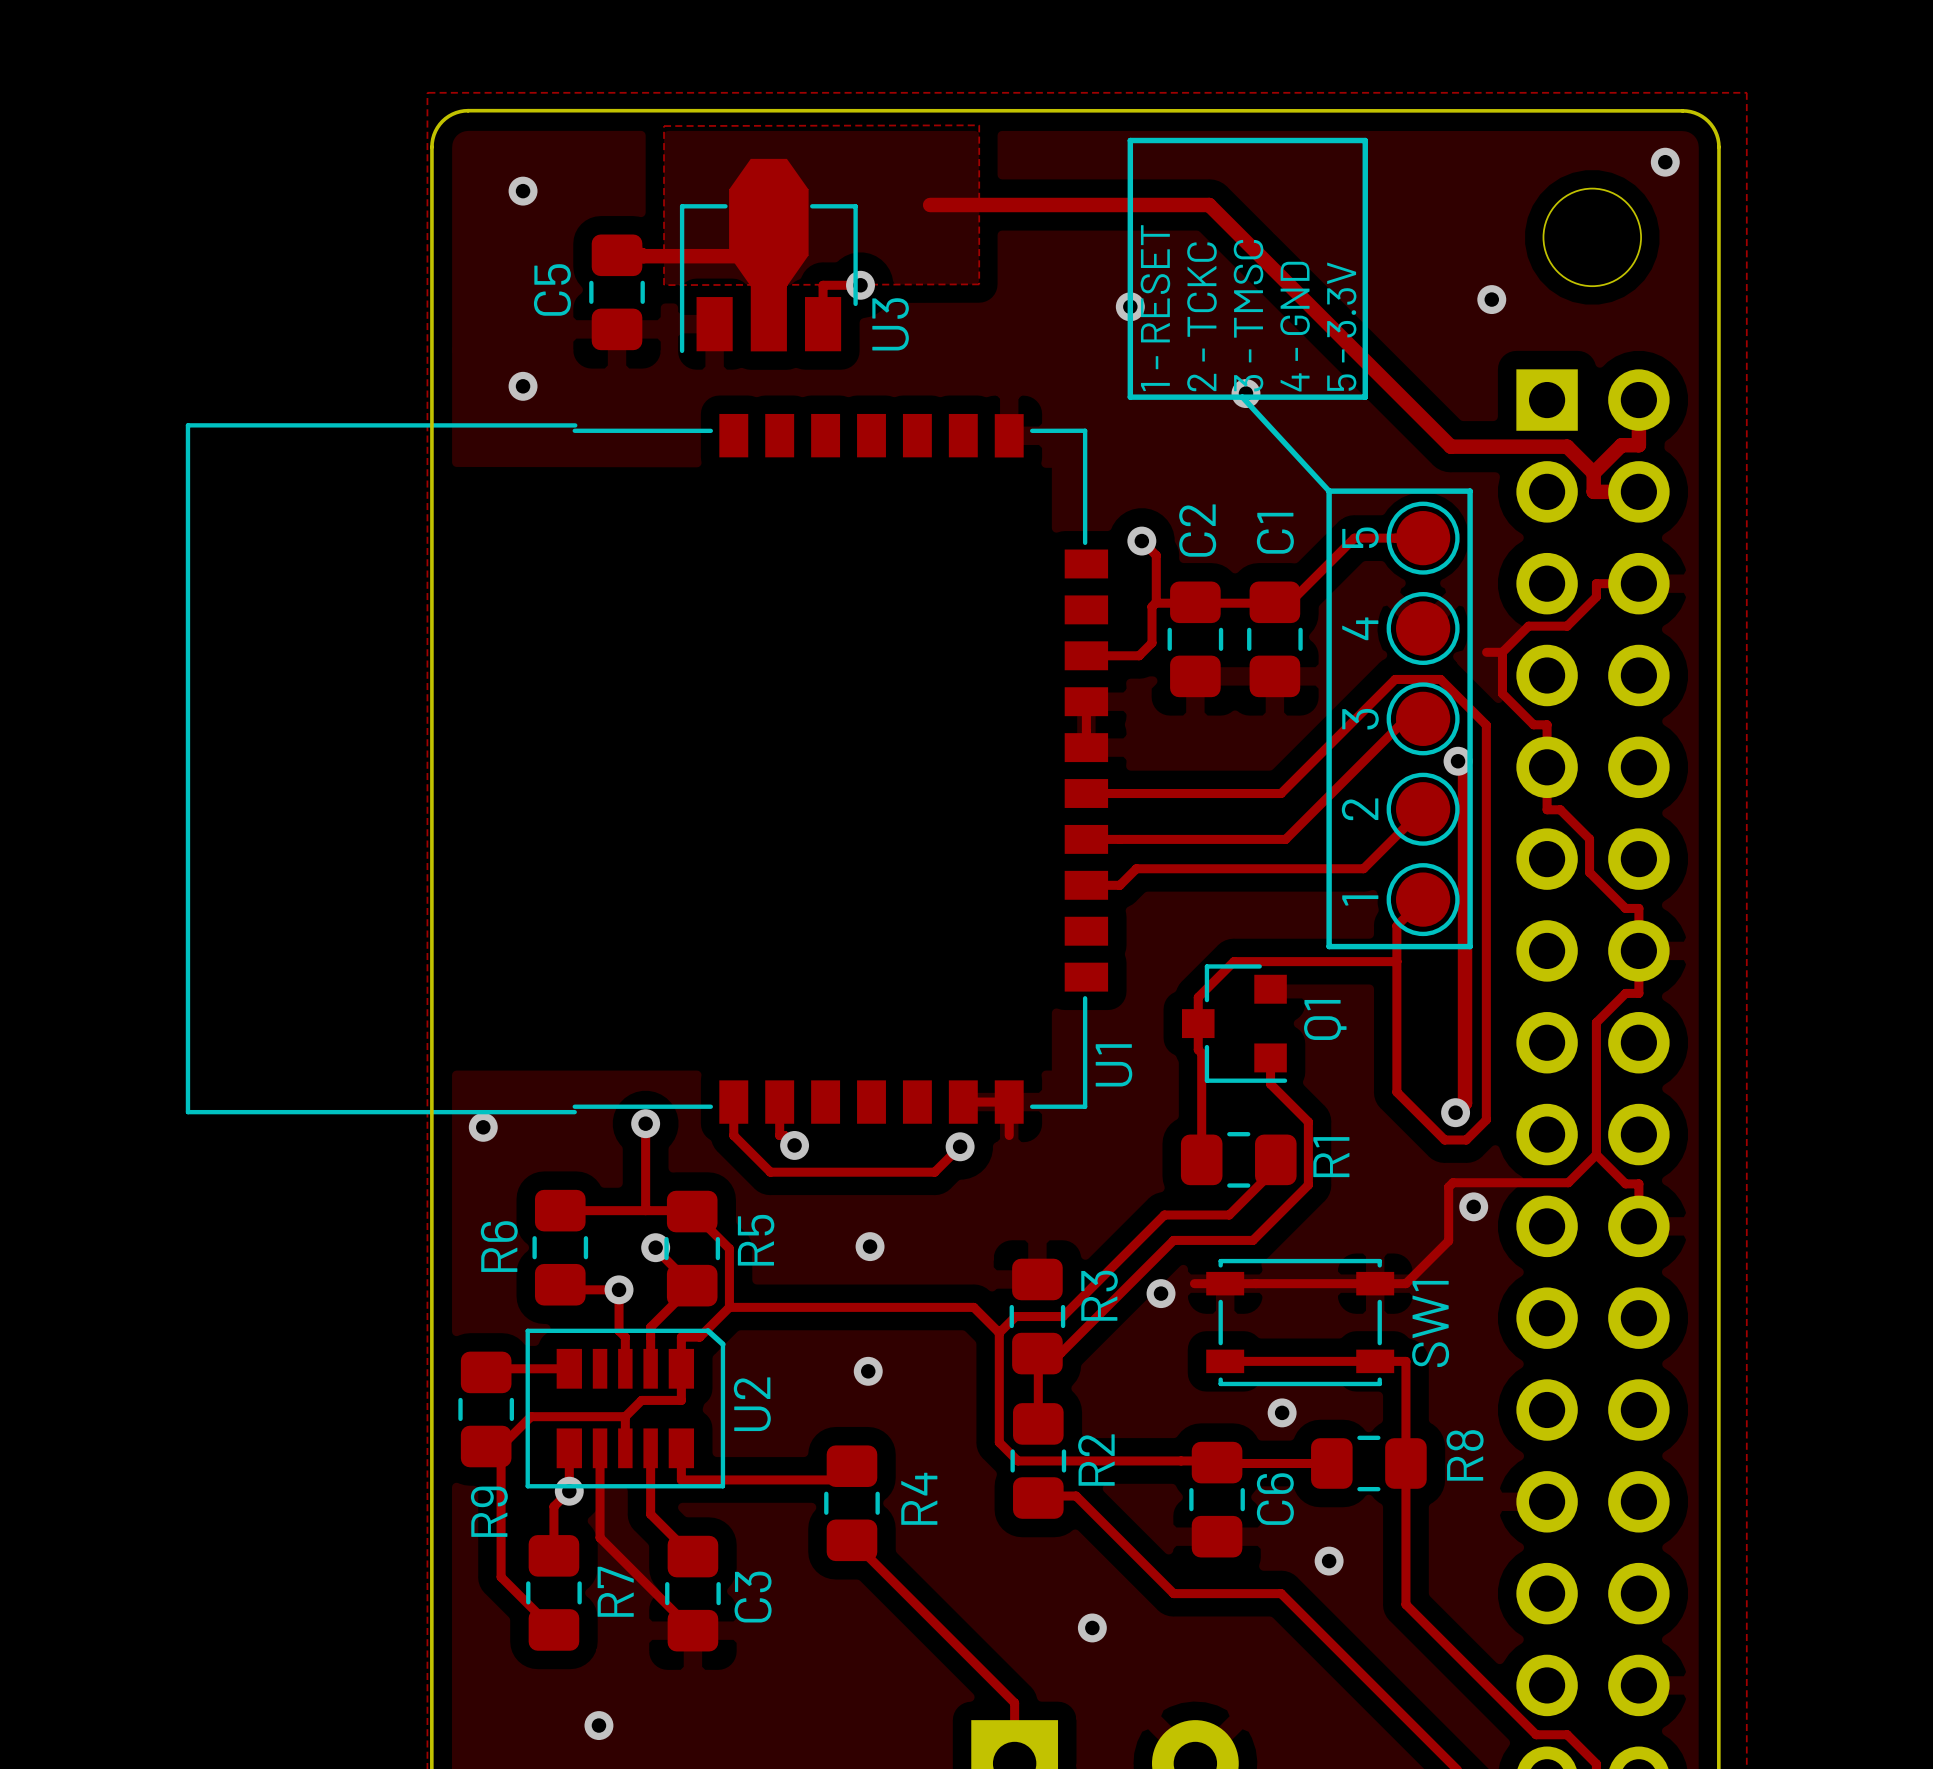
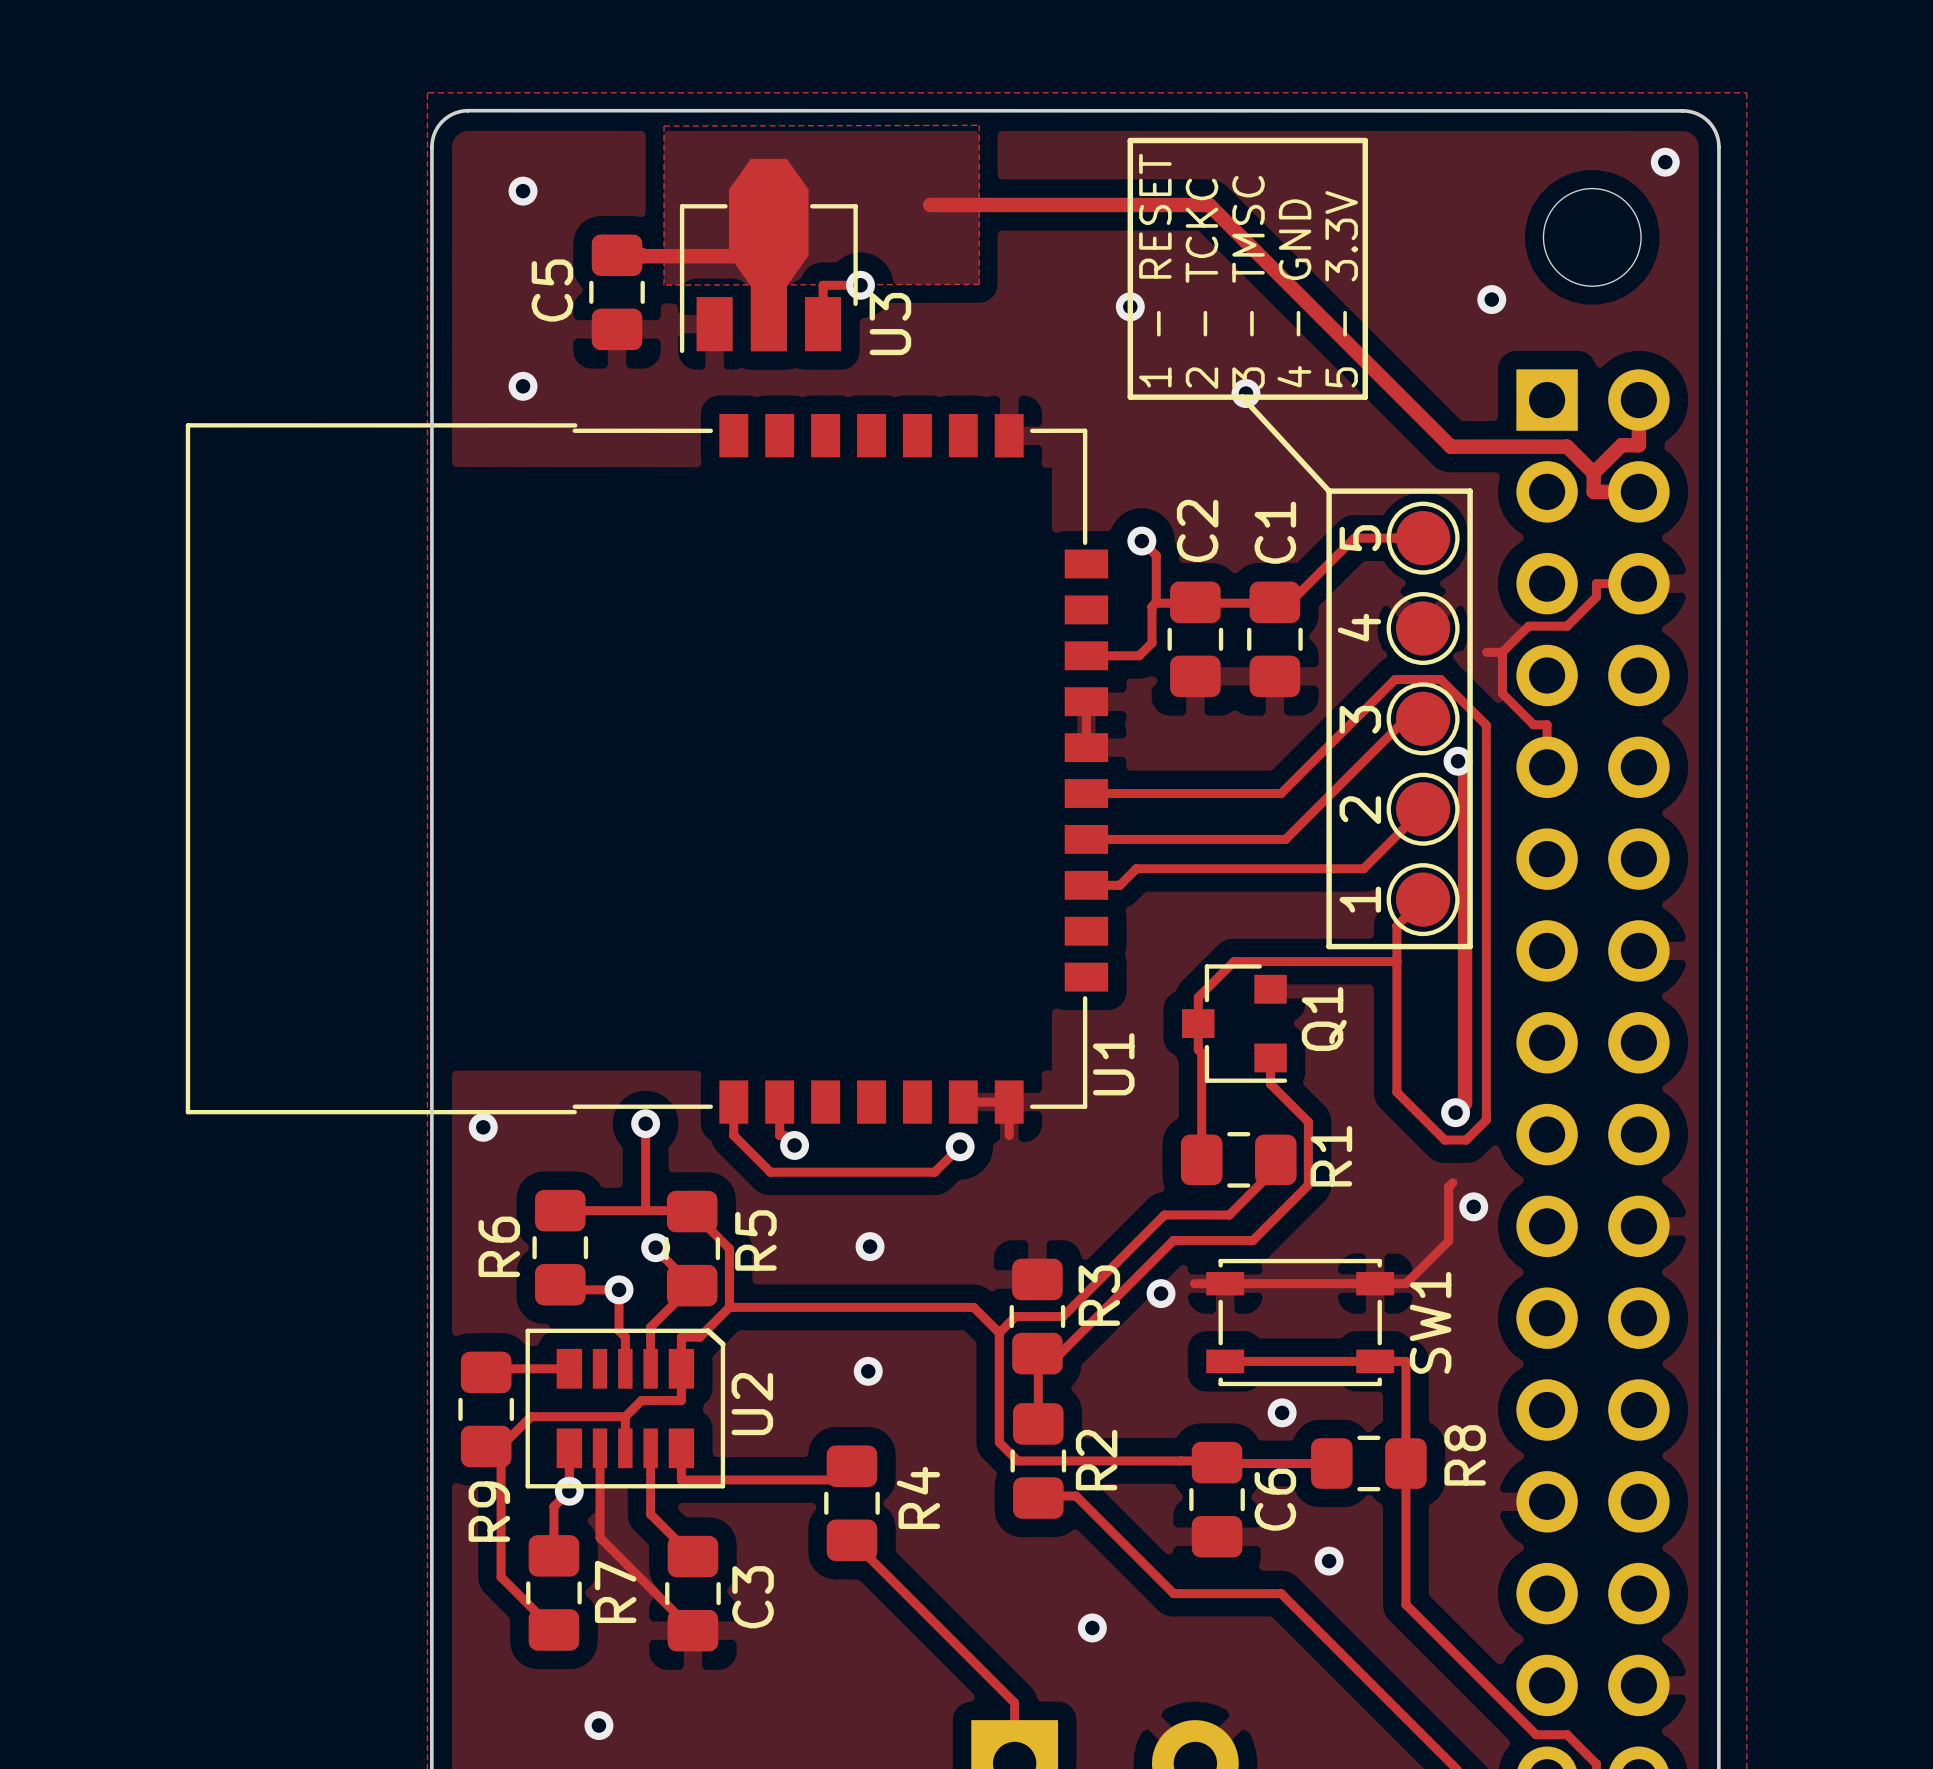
track: (1547, 767) (1547, 809) (1560, 809) (1589, 838) (1589, 872) (1625, 908) (1638, 908) (1638, 929) -> none
track: (1638, 950) (1638, 993) (1625, 993) (1596, 1022) (1596, 1154) -> none
track: (1596, 1154) (1568, 1182) (1452, 1182) -> none
track: (1596, 1154) (1625, 1183) (1638, 1183) (1638, 1226) -> none

